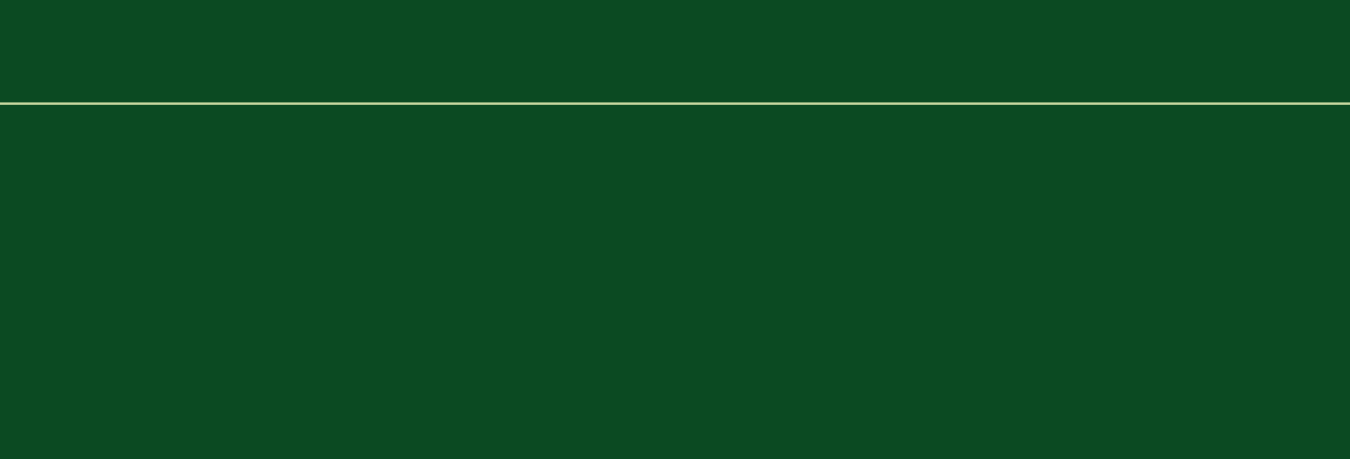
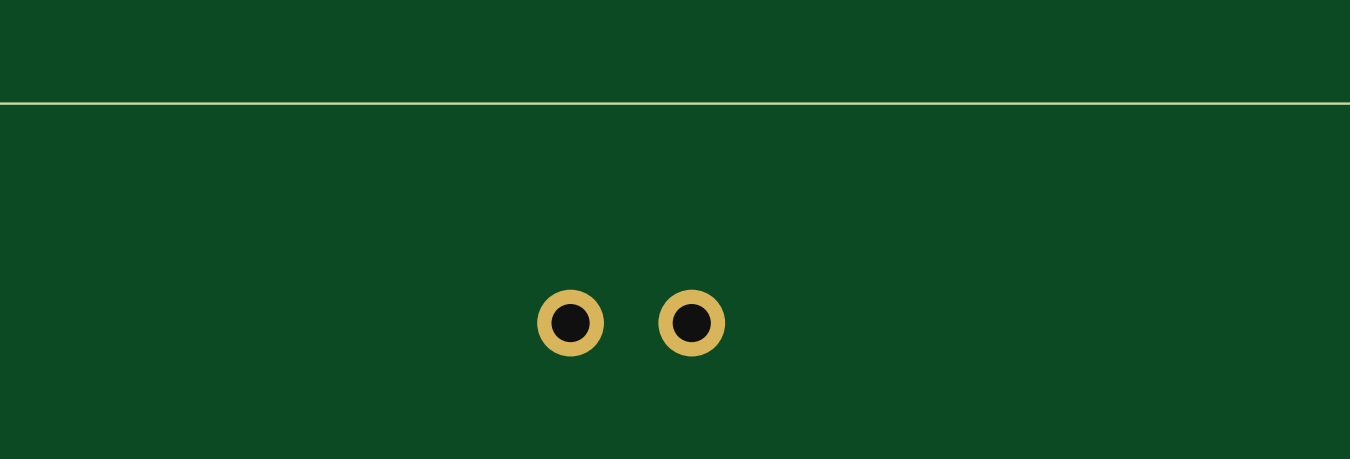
part: none -> (631, 323)

